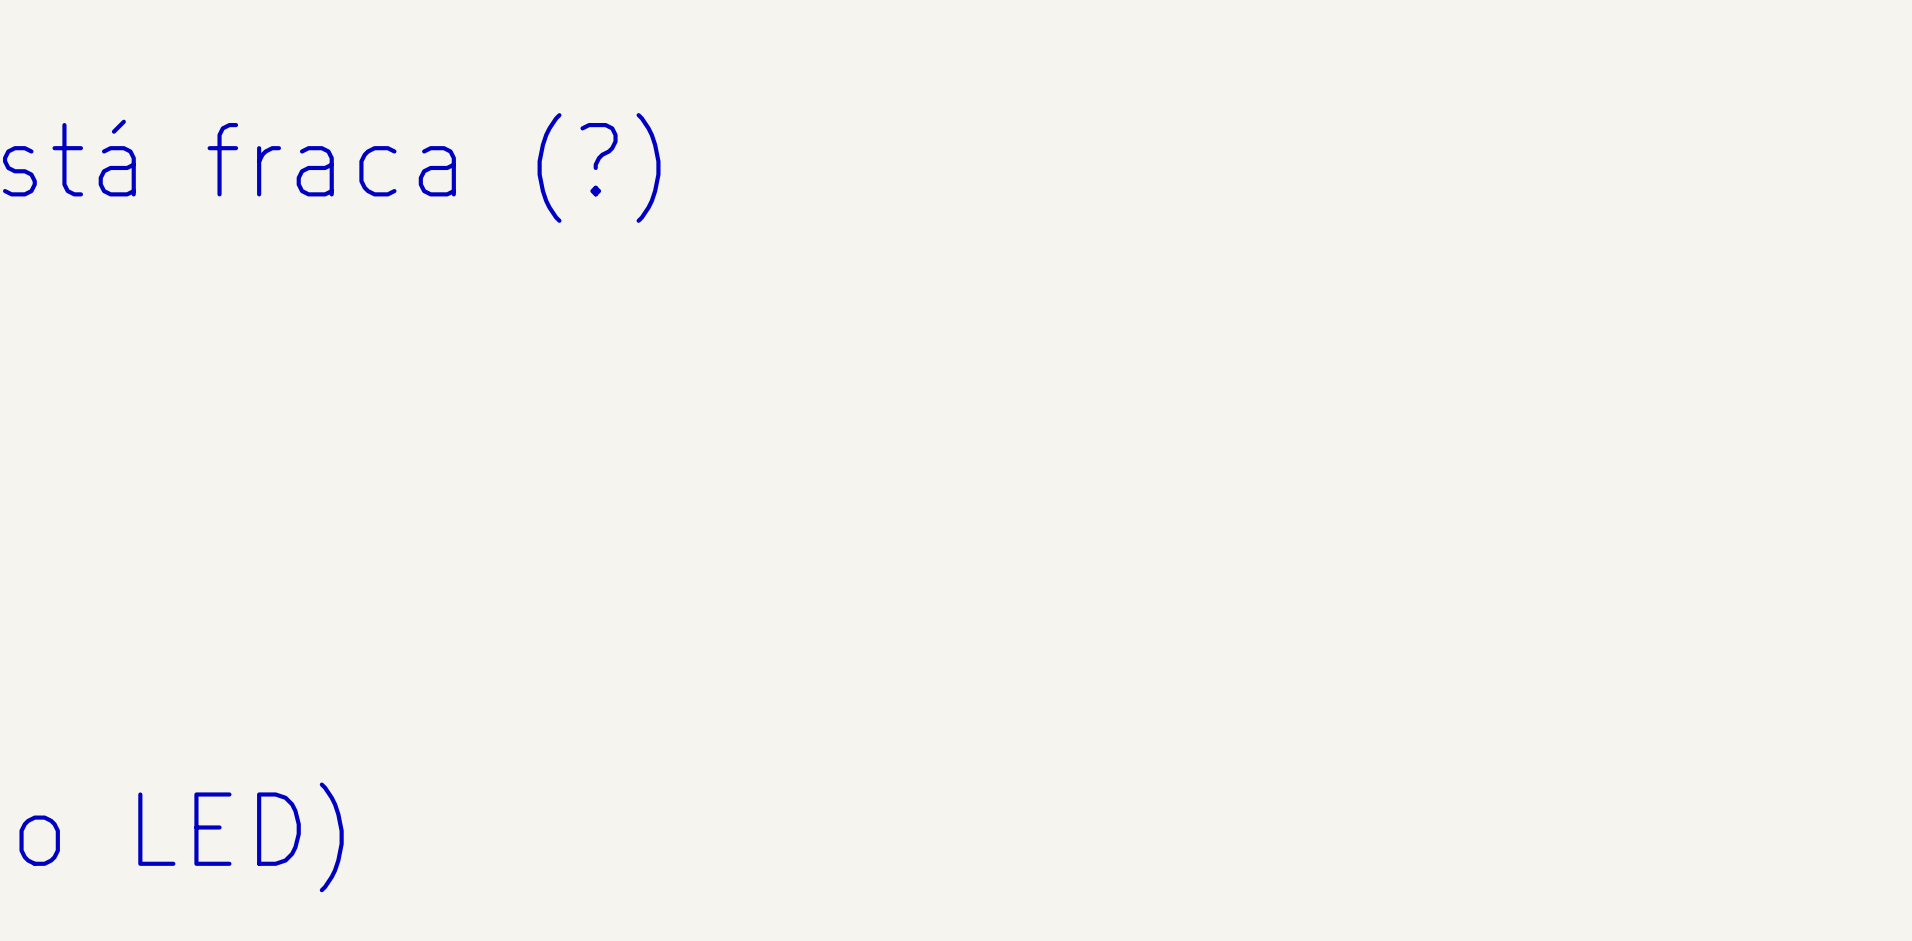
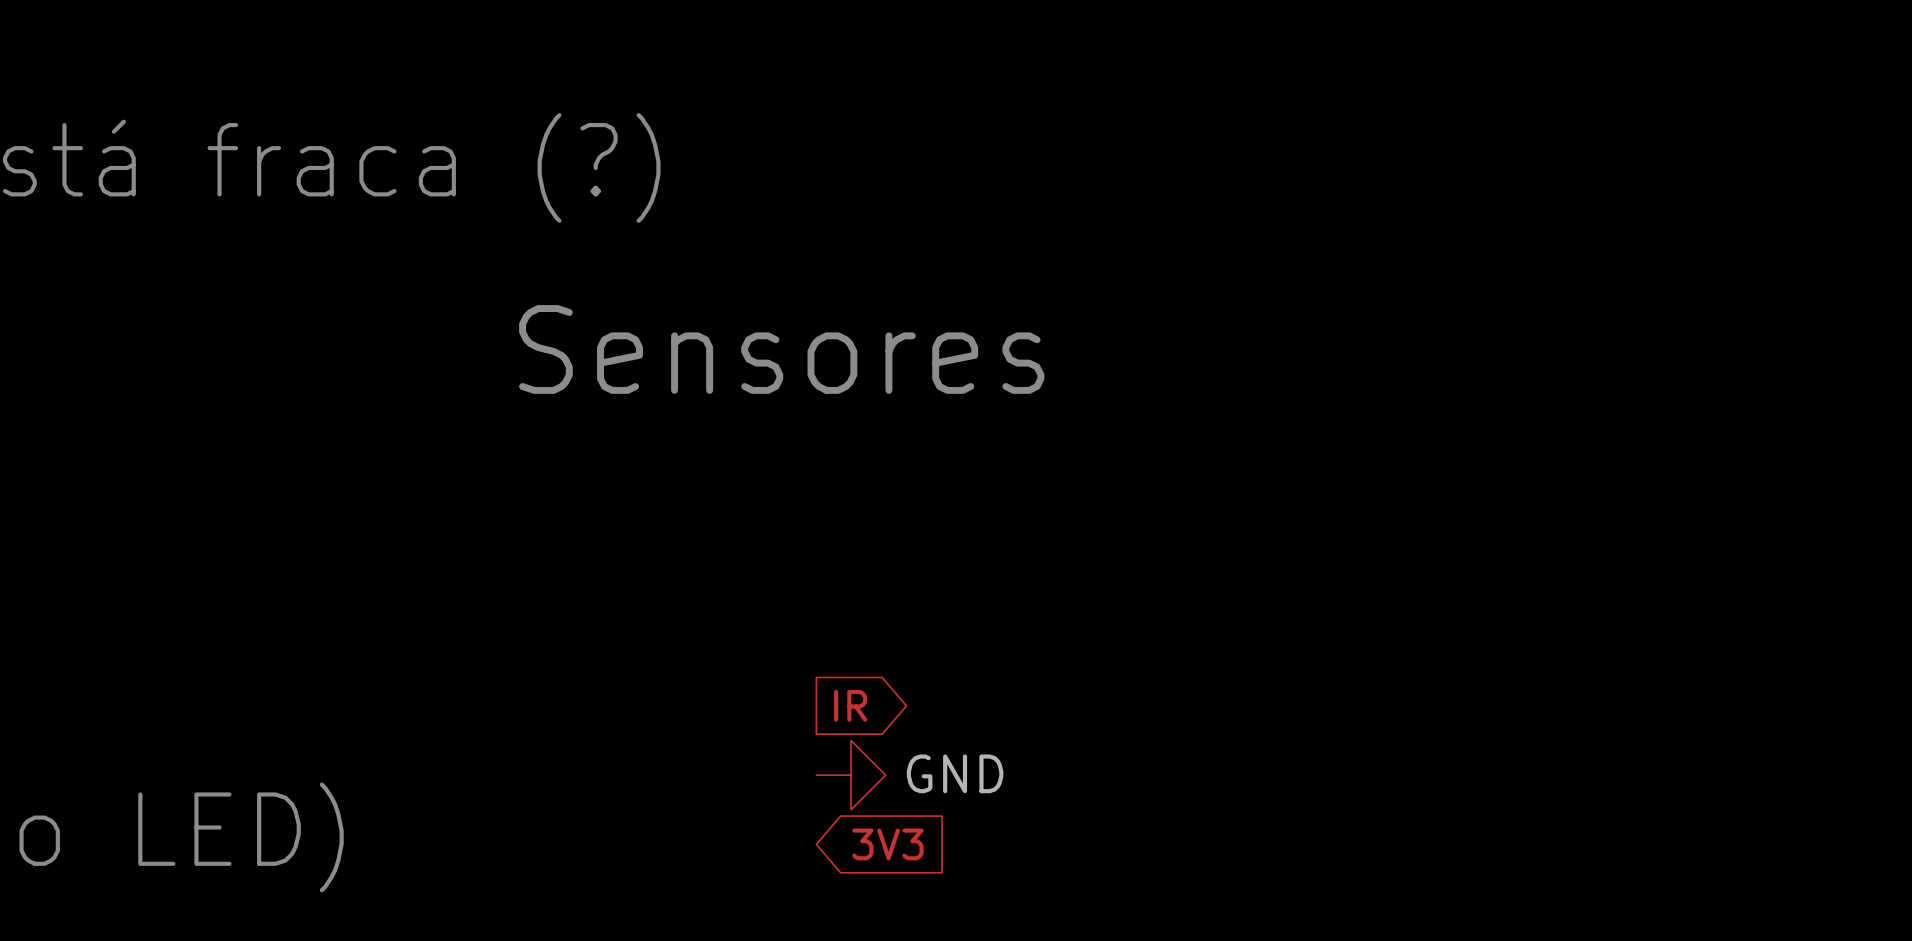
text: none -> Sensores (781, 349)
global label: none -> IR (850, 705)
power symbol: none -> GND (851, 775)
global label: none -> 3V3 (887, 844)

